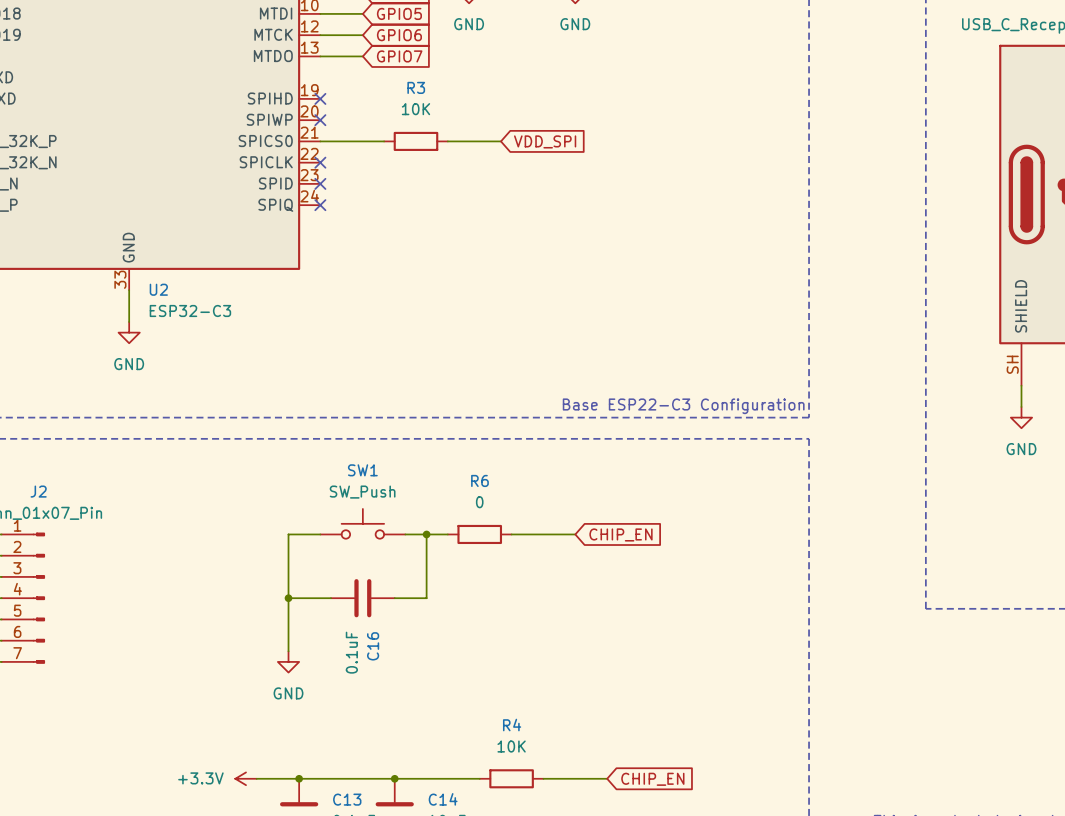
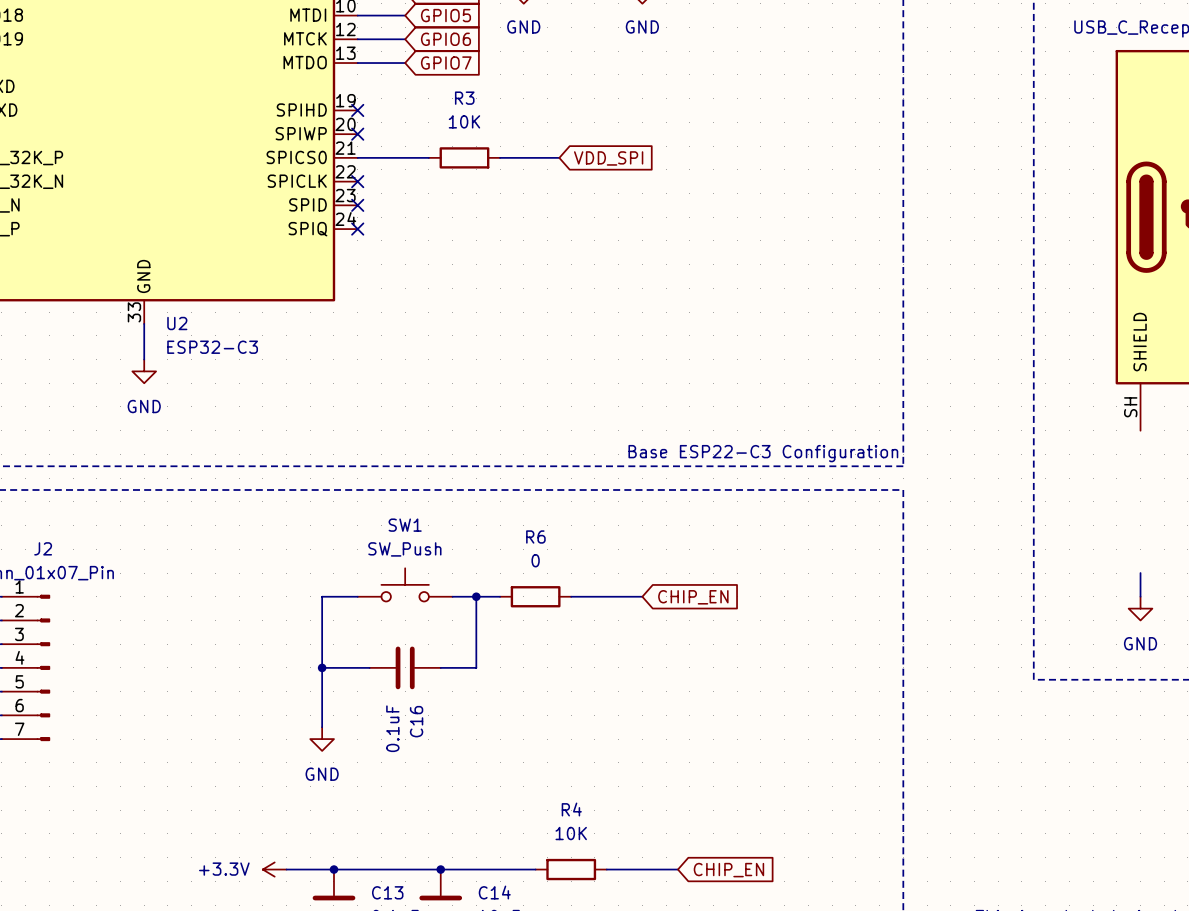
wire: (1021, 385) (1021, 406) -> (1140, 573) (1140, 596)
power symbol: GND (1021, 417) -> none
power symbol: none -> GND (1140, 608)

